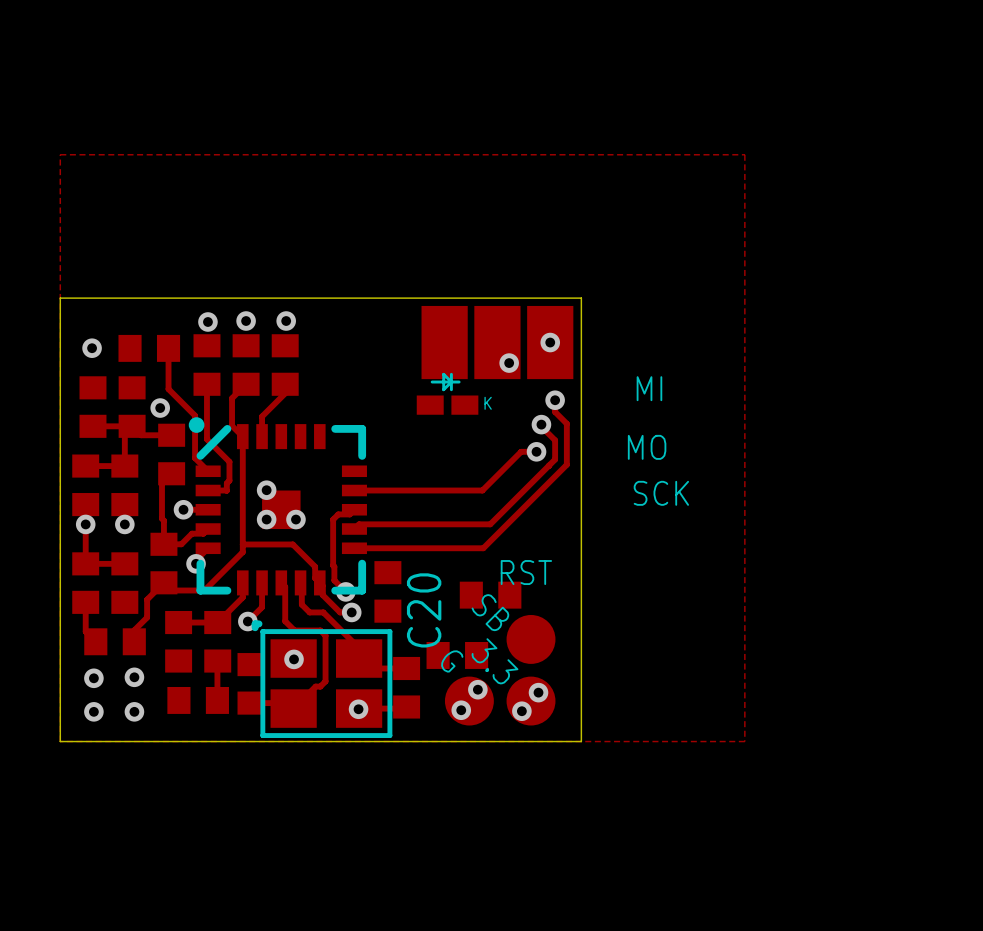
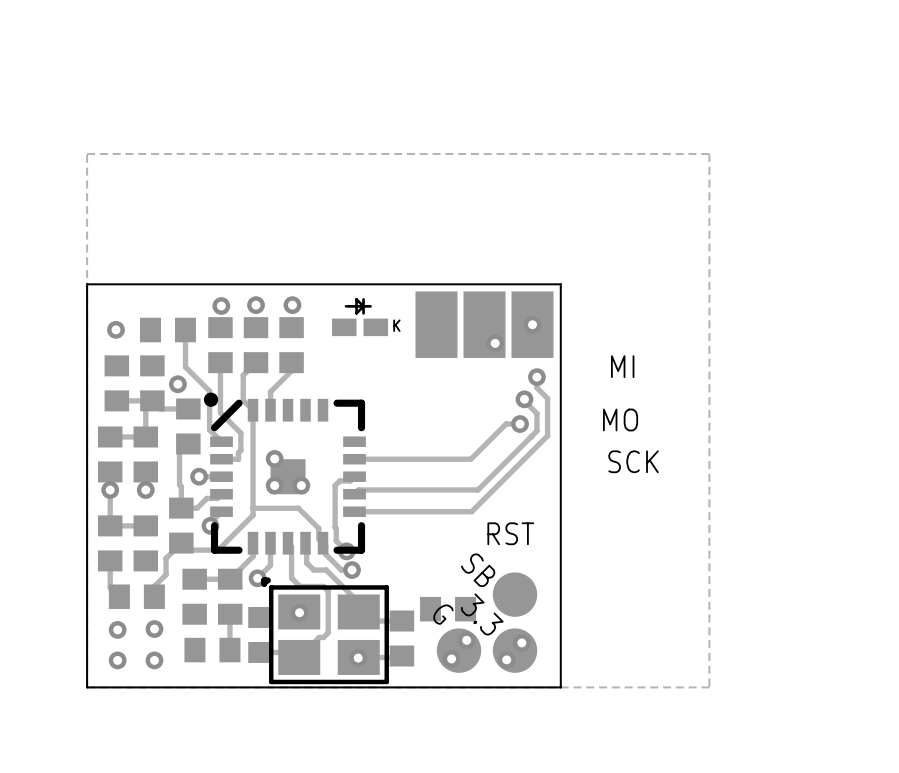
part position: (447, 393) -> (360, 317)
C20: (387, 591) -> none
part: (490, 595) -> none

